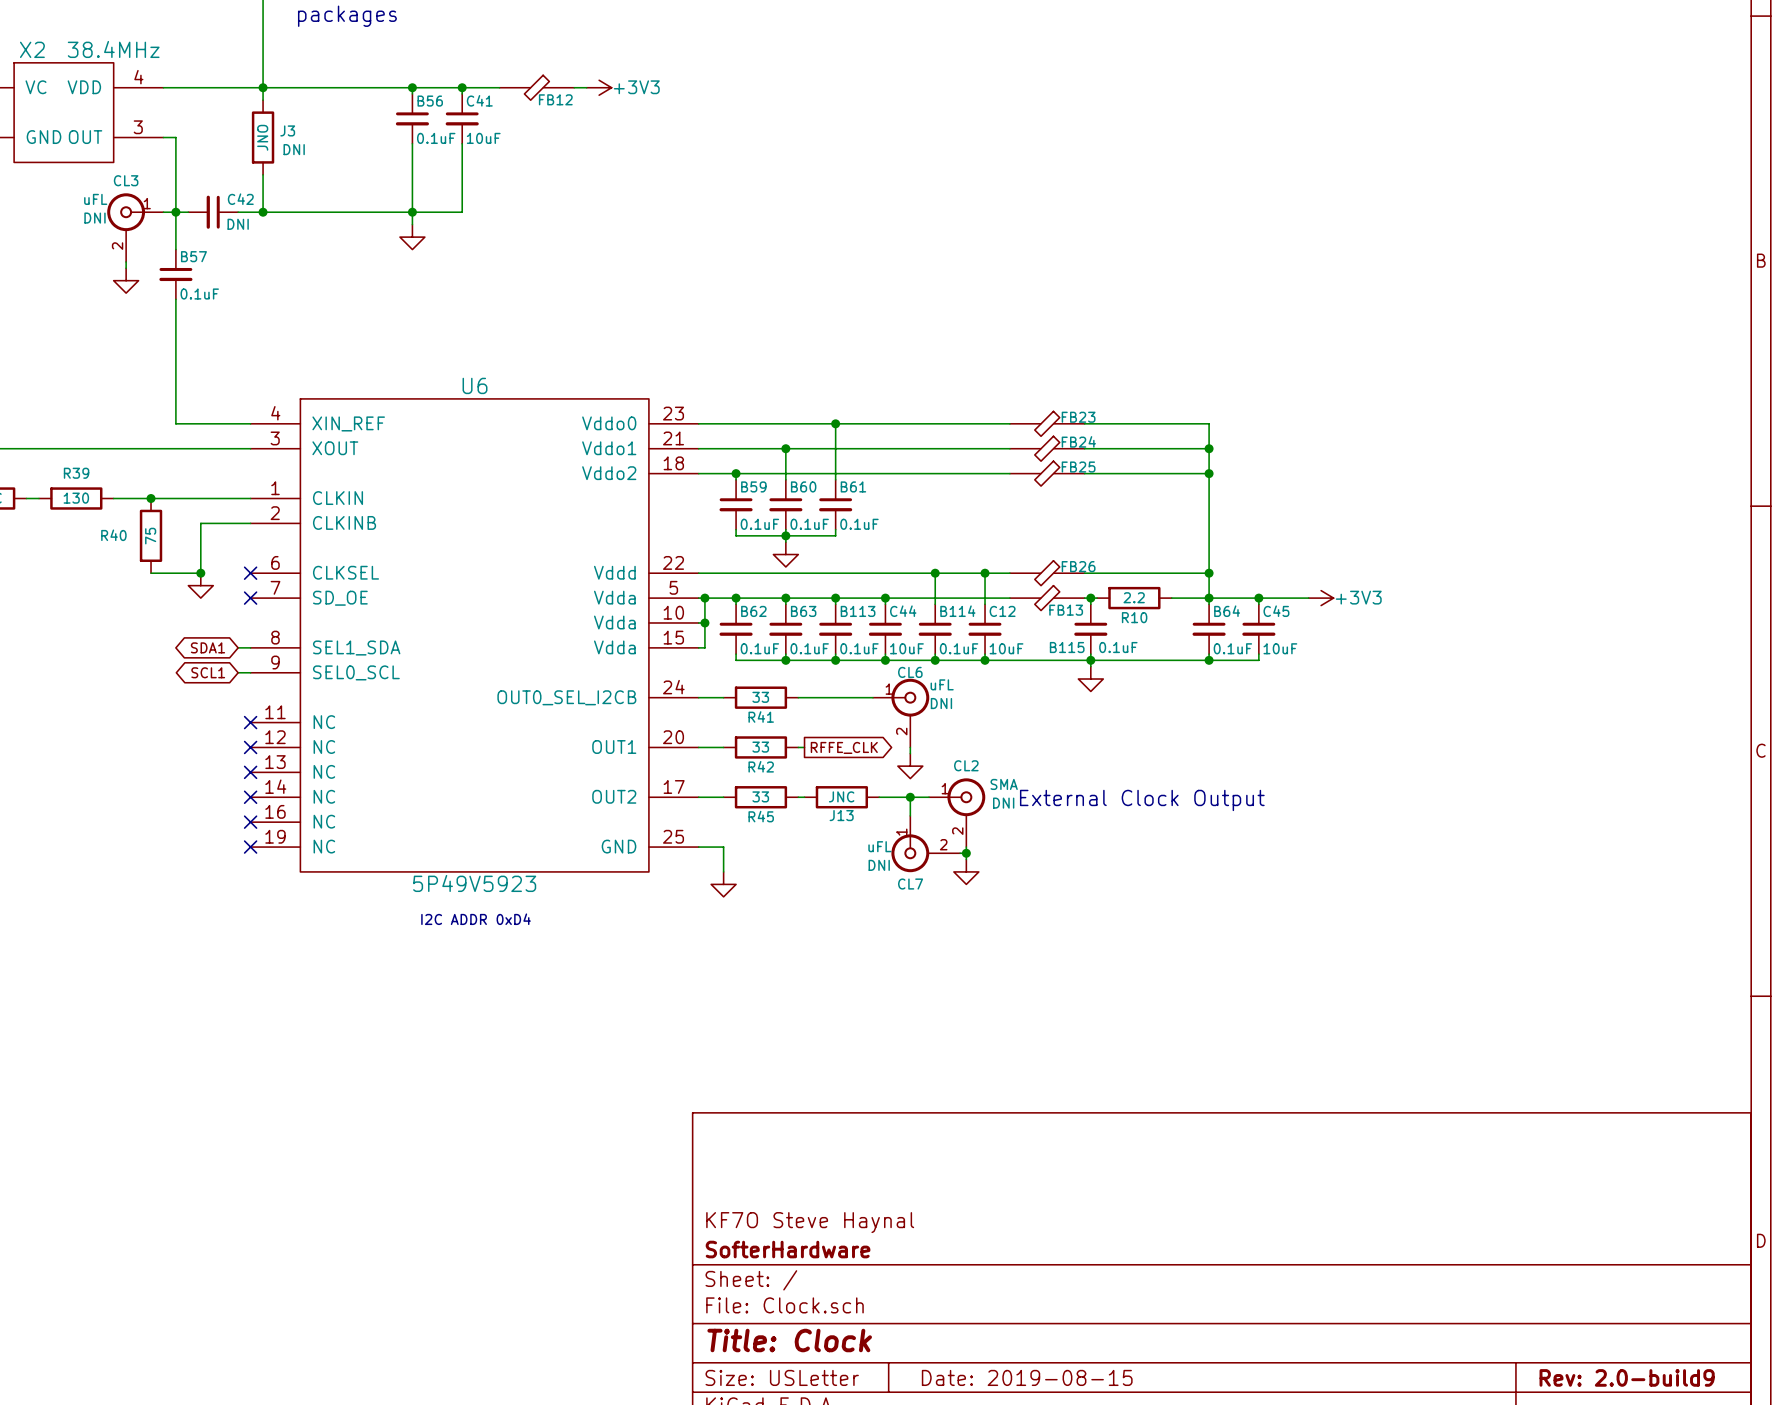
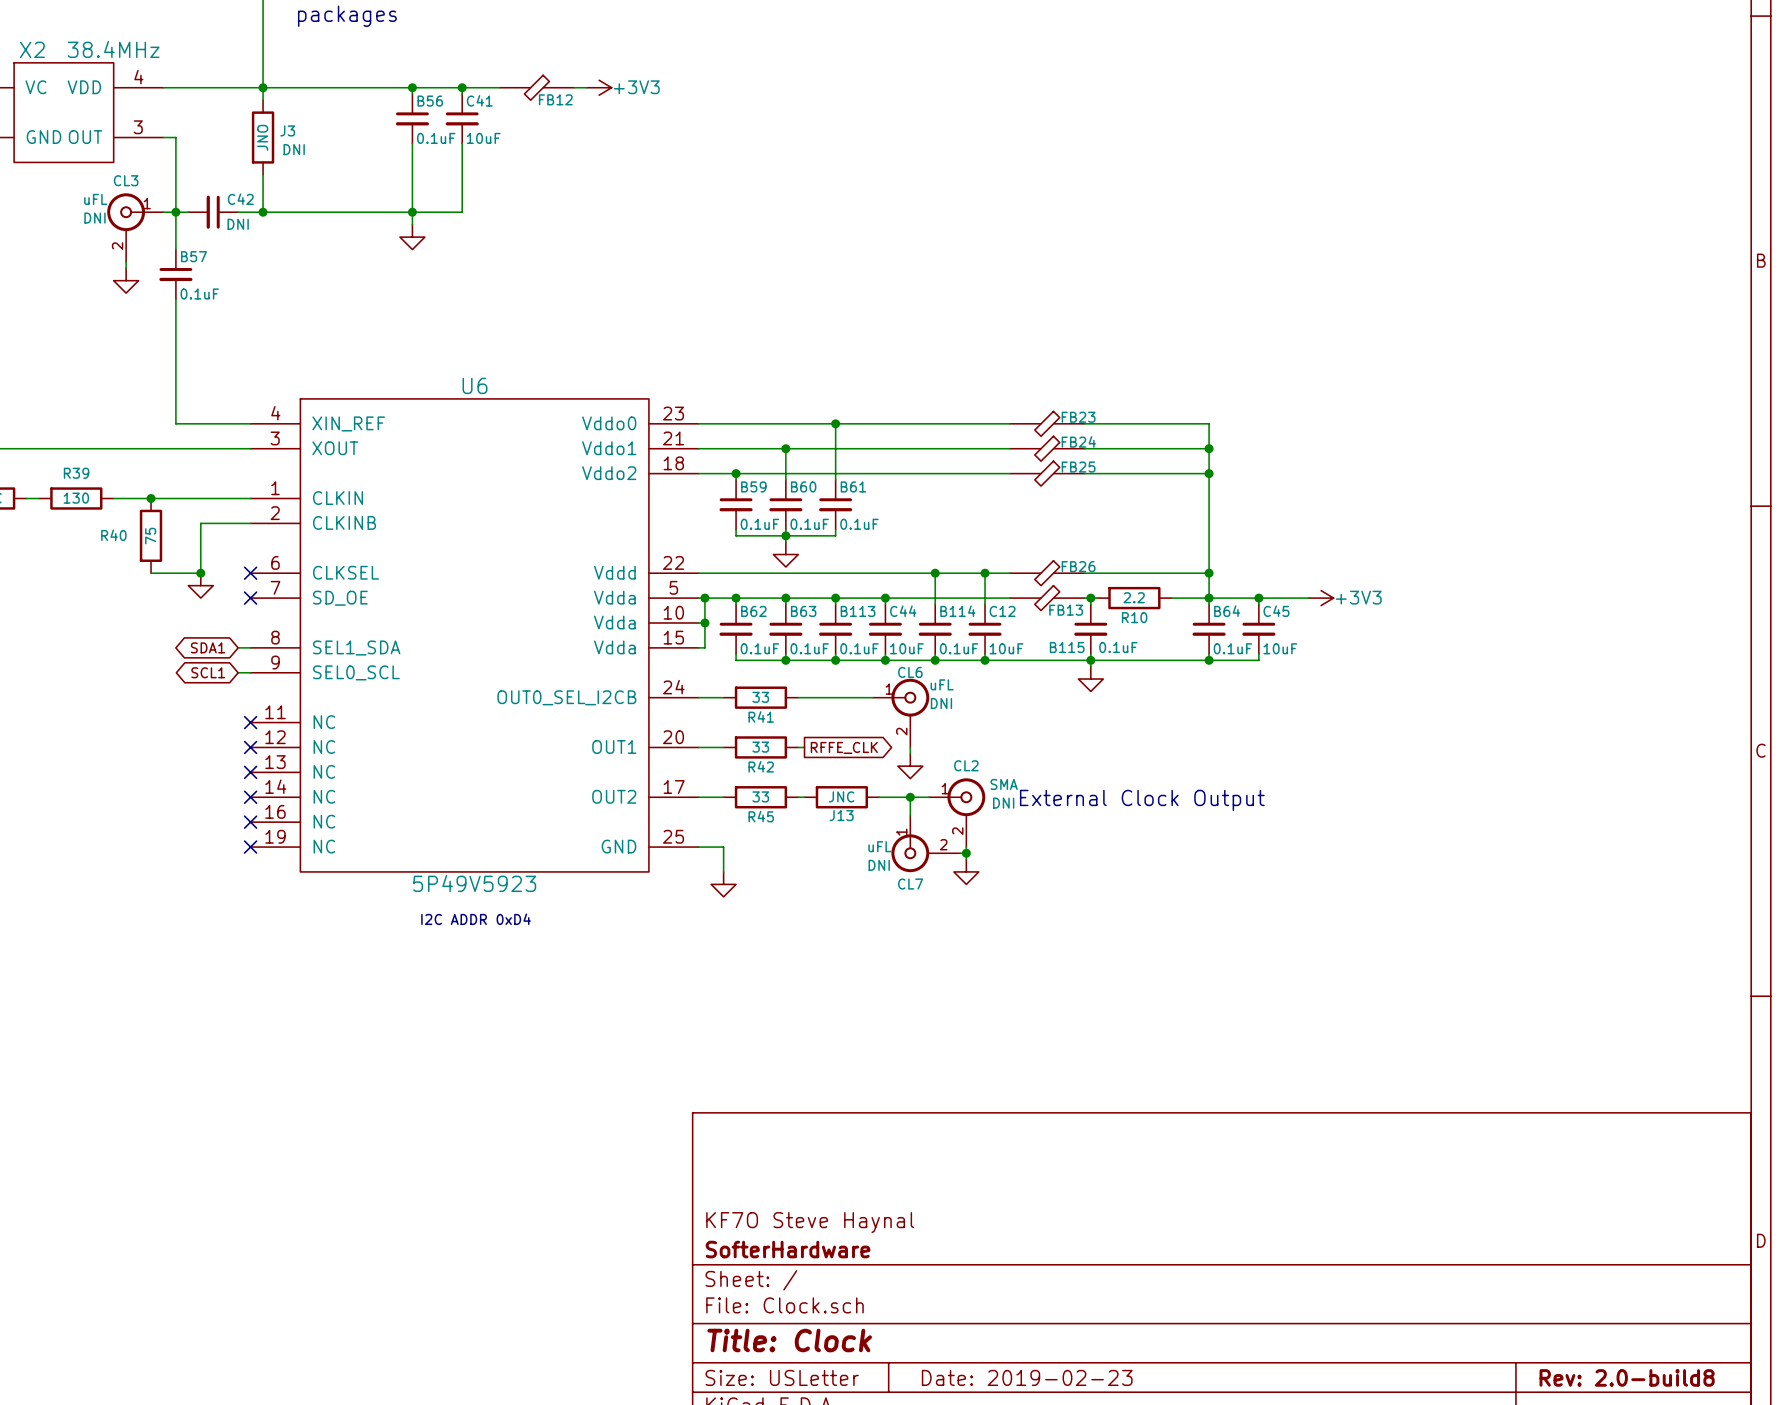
title block: Date: 2019-08-15 (1027, 1377) -> Date: 2019-02-23 (1027, 1377)
title block: Rev: 2.0-build9 (1627, 1377) -> Rev: 2.0-build8 (1627, 1377)

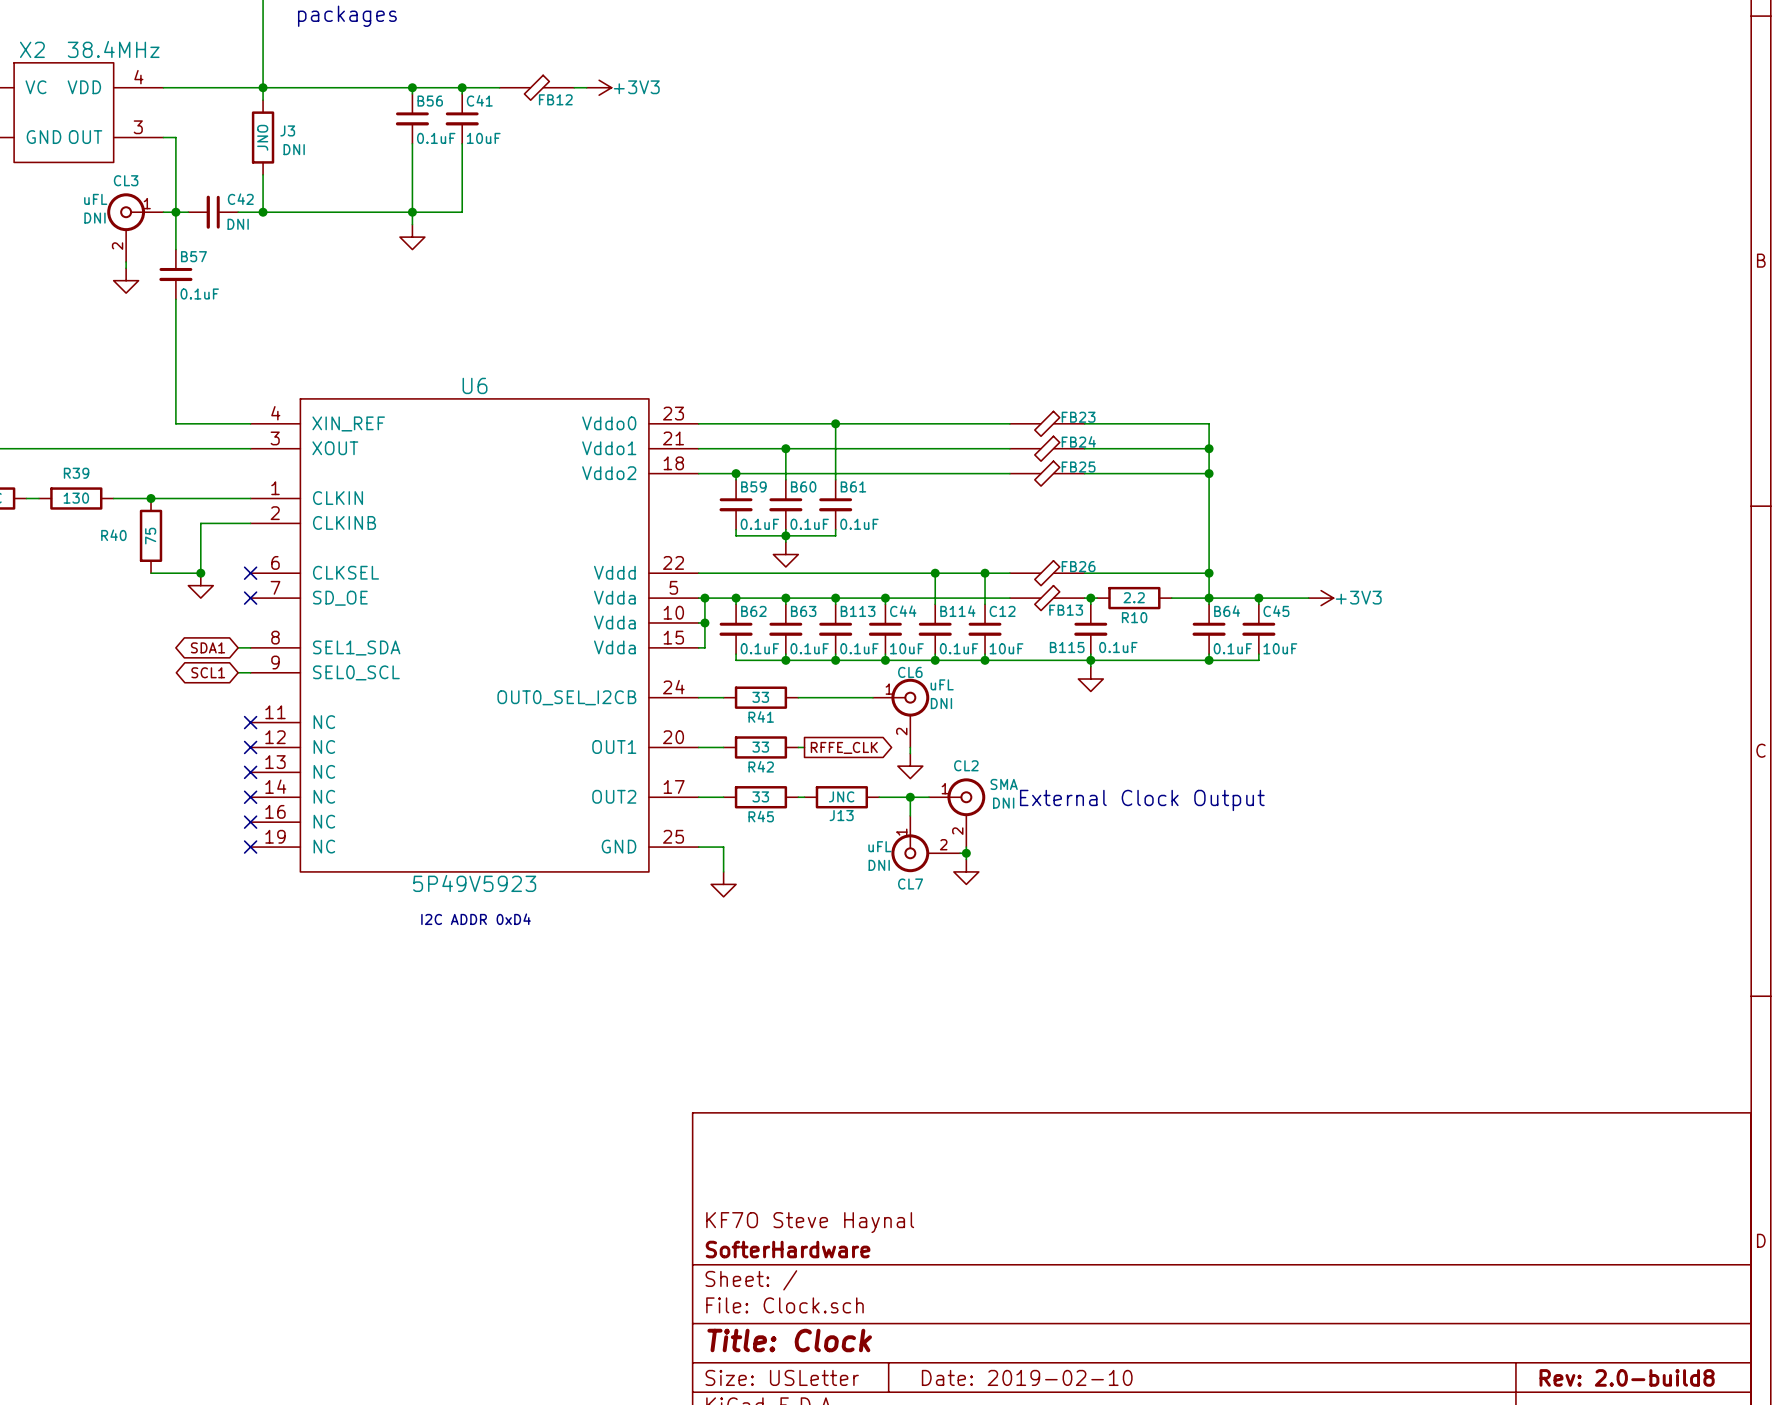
title block: Date: 2019-02-23 (1027, 1377) -> Date: 2019-02-10 (1027, 1377)

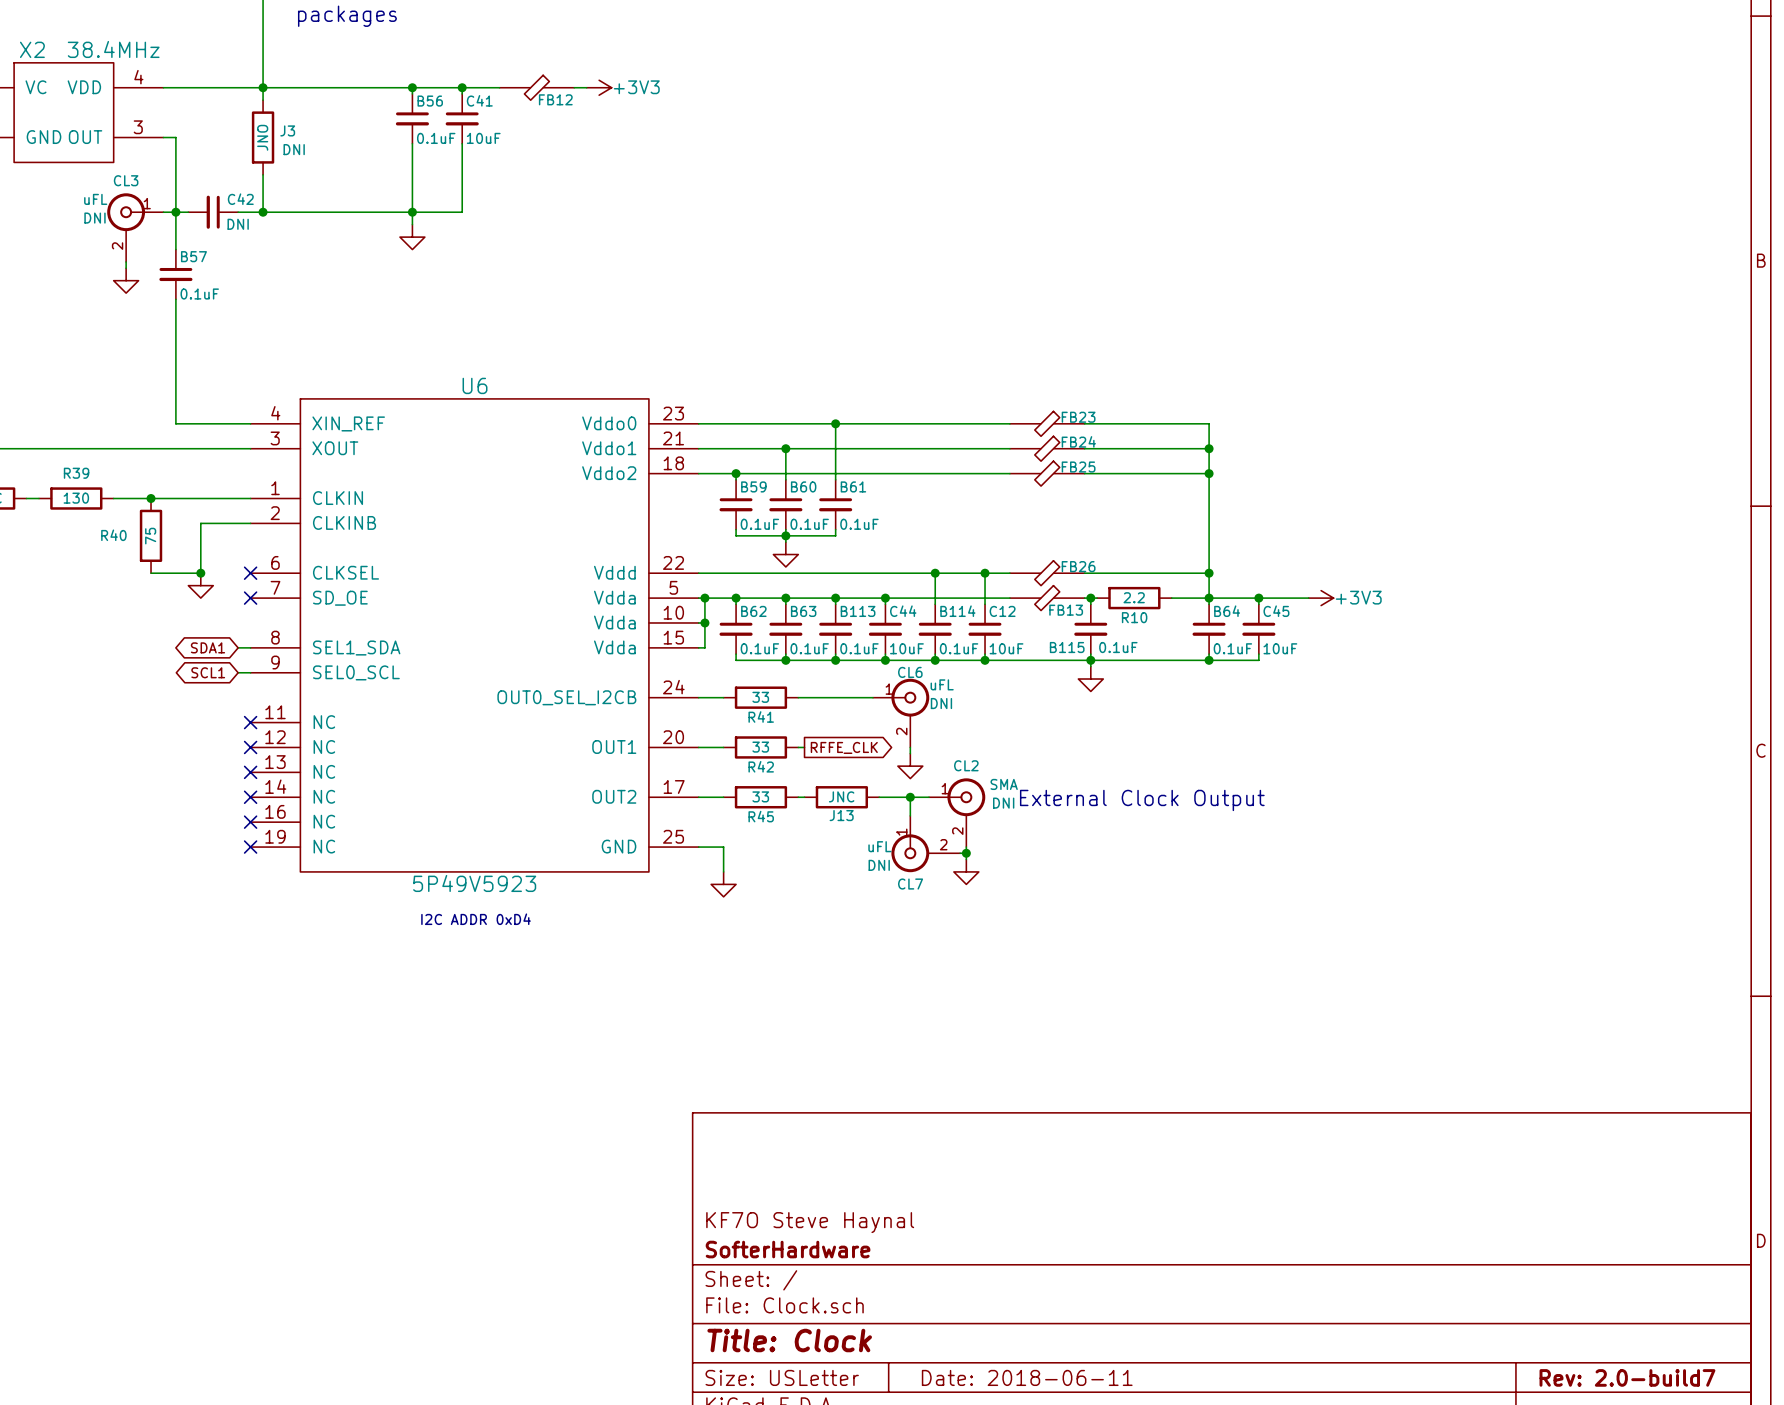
title block: Date: 2019-02-10 (1027, 1377) -> Date: 2018-06-11 (1027, 1377)
title block: Rev: 2.0-build8 (1627, 1377) -> Rev: 2.0-build7 (1627, 1377)

